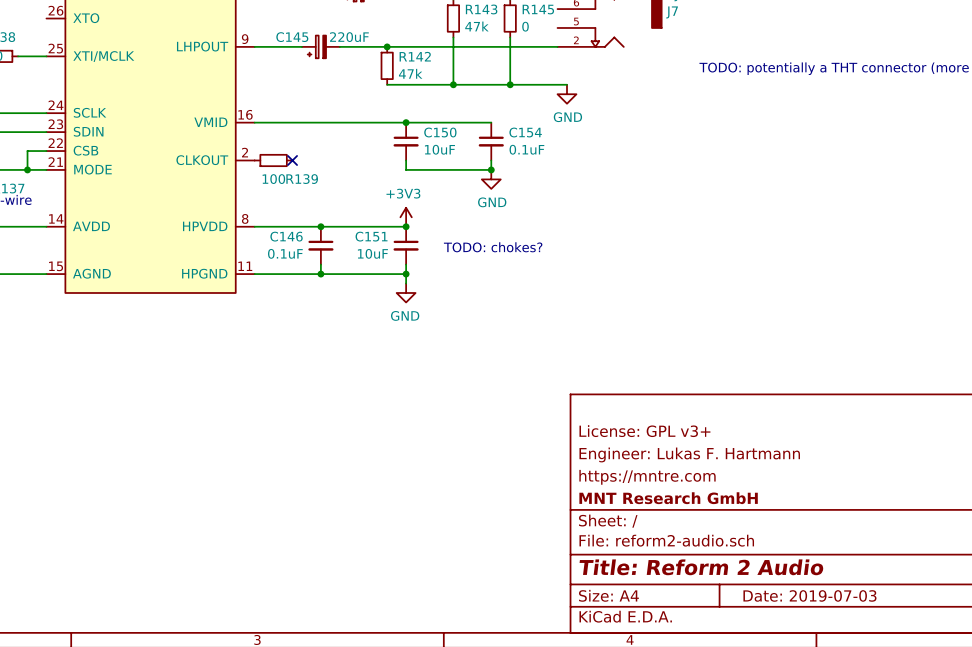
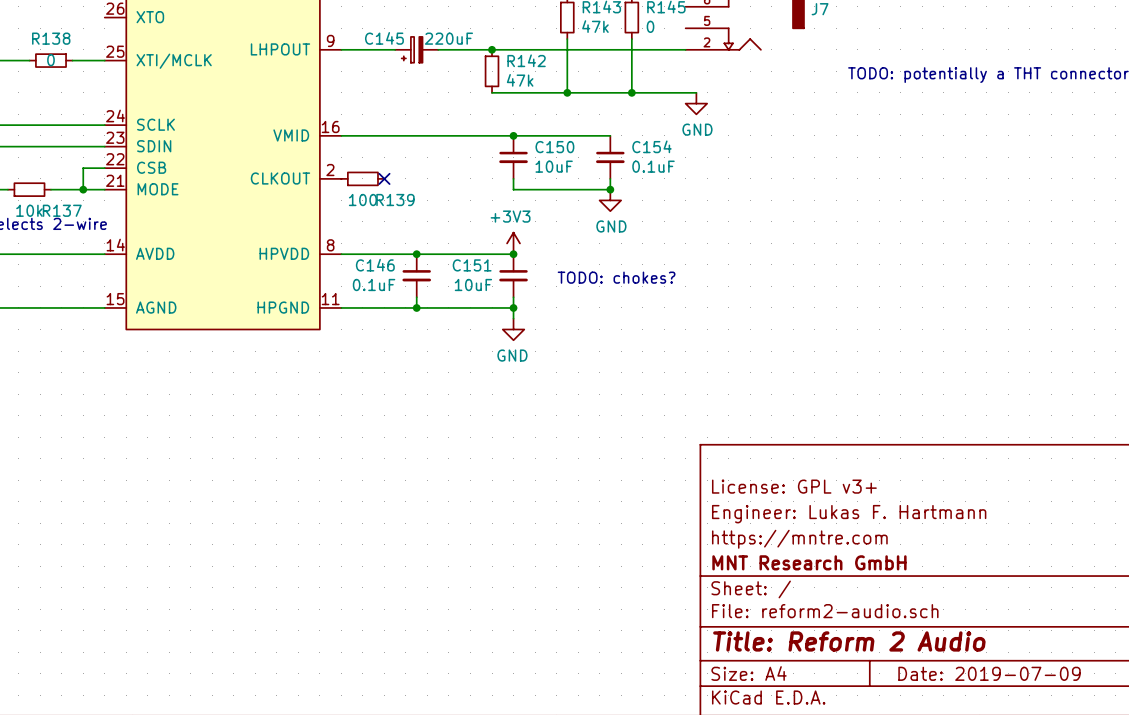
title block: Date: 2019-07-03 (809, 595) -> Date: 2019-07-09 (989, 673)

